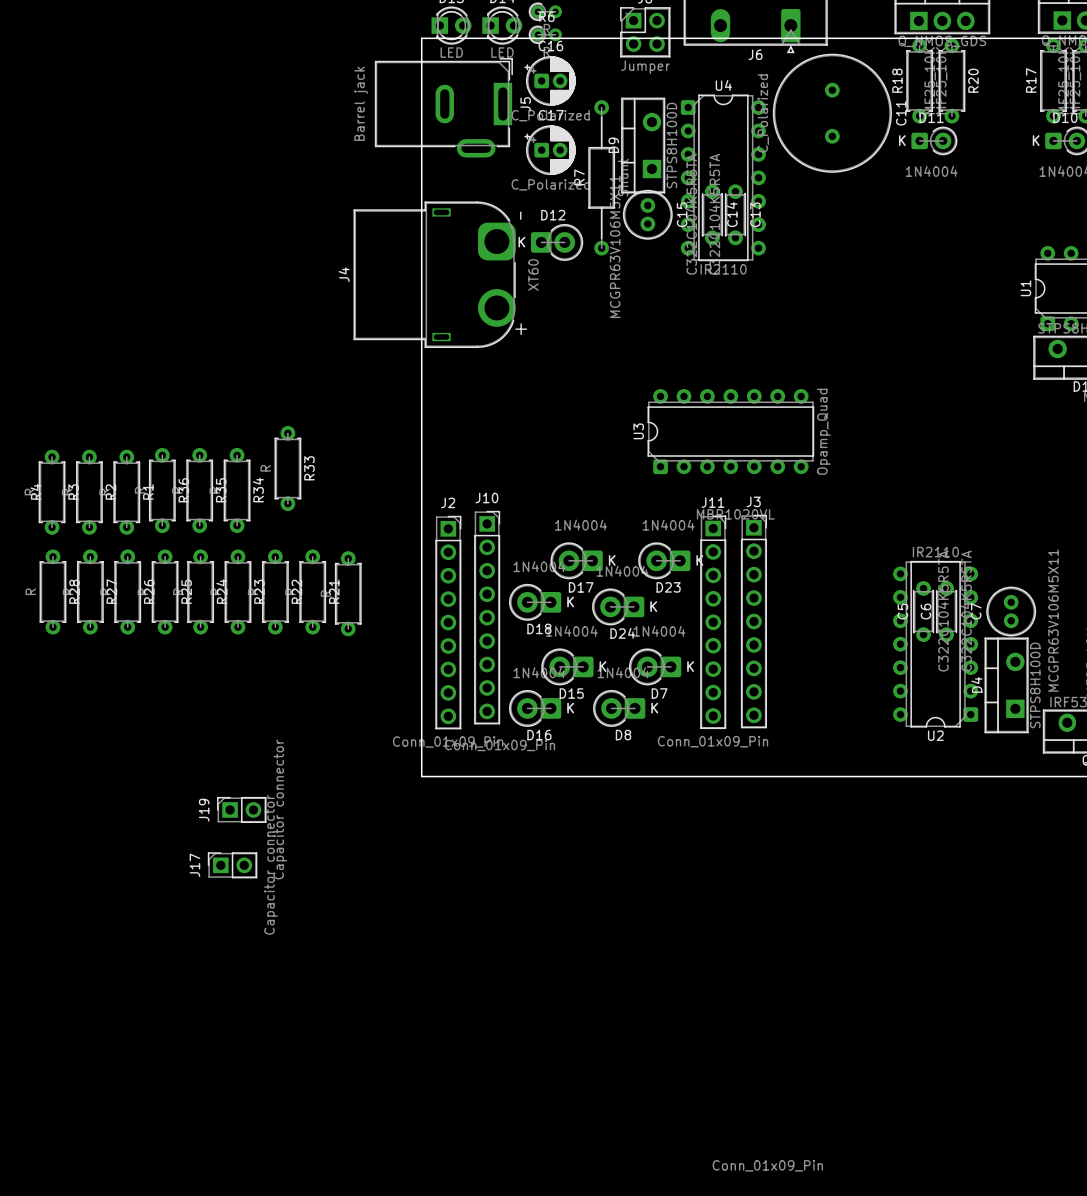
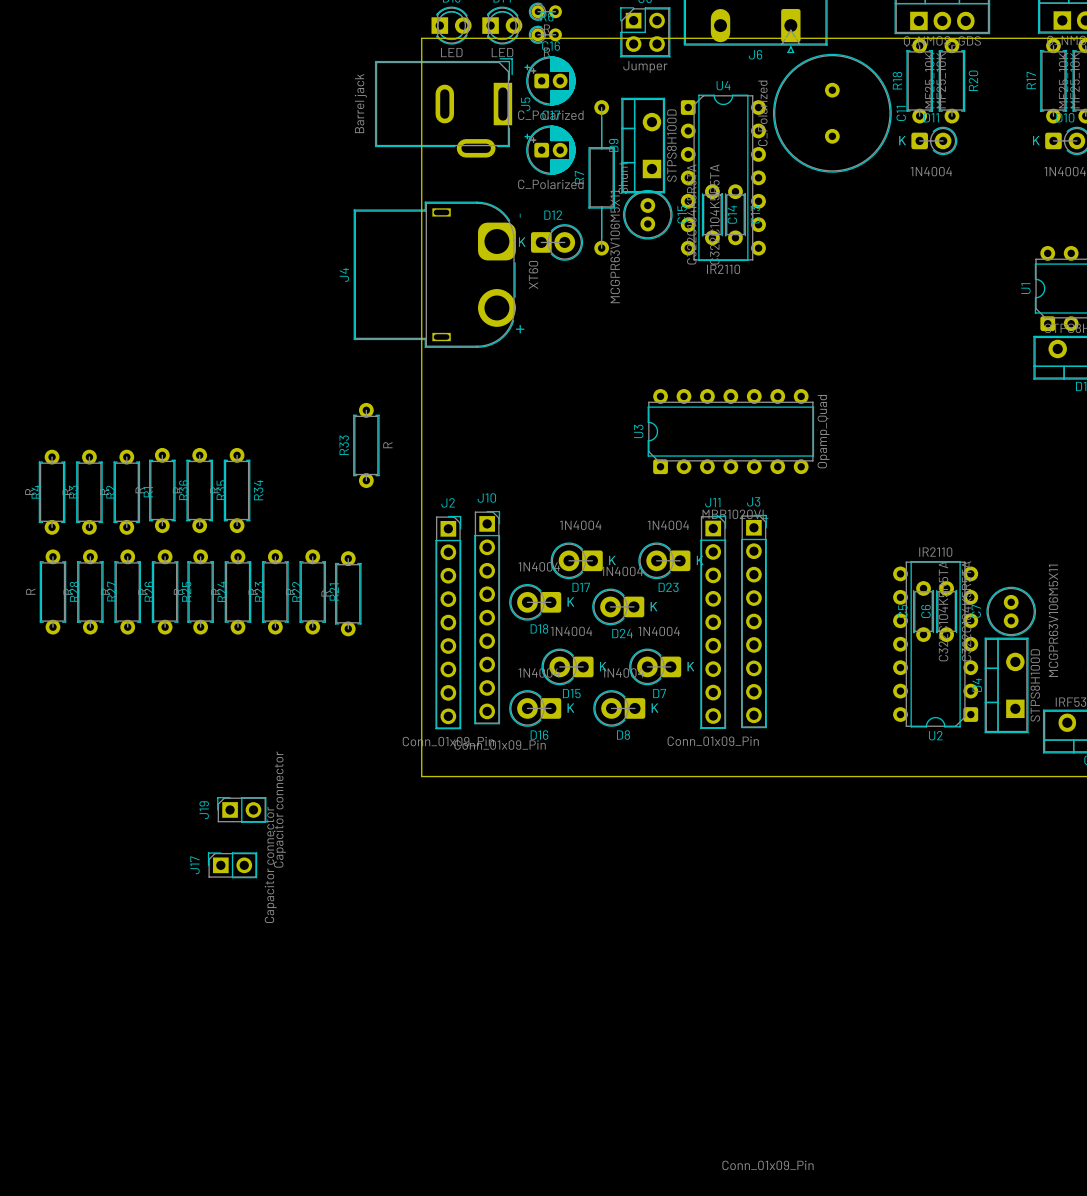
R33 value position: R (265, 468) -> R (387, 445)
R33 position: (287, 468) -> (366, 445)
R33 name position: R33 (309, 468) -> R33 (344, 445)

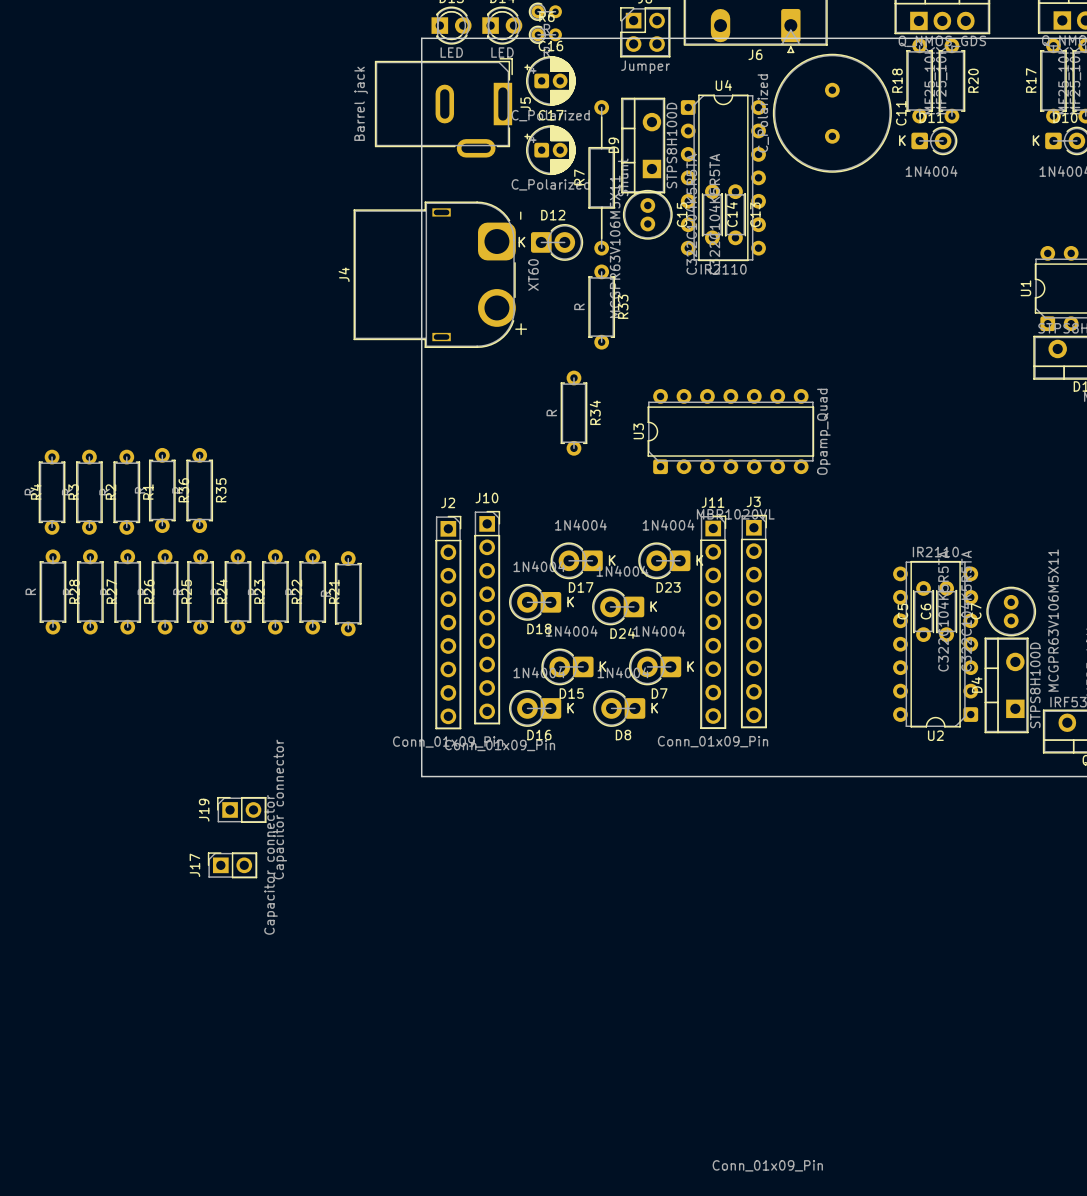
R33 name position: R33 (344, 445) -> R33 (623, 306)
R33 position: (366, 445) -> (601, 307)
R33 value position: R (387, 445) -> R (579, 306)
R34 position: (237, 490) -> (573, 413)

